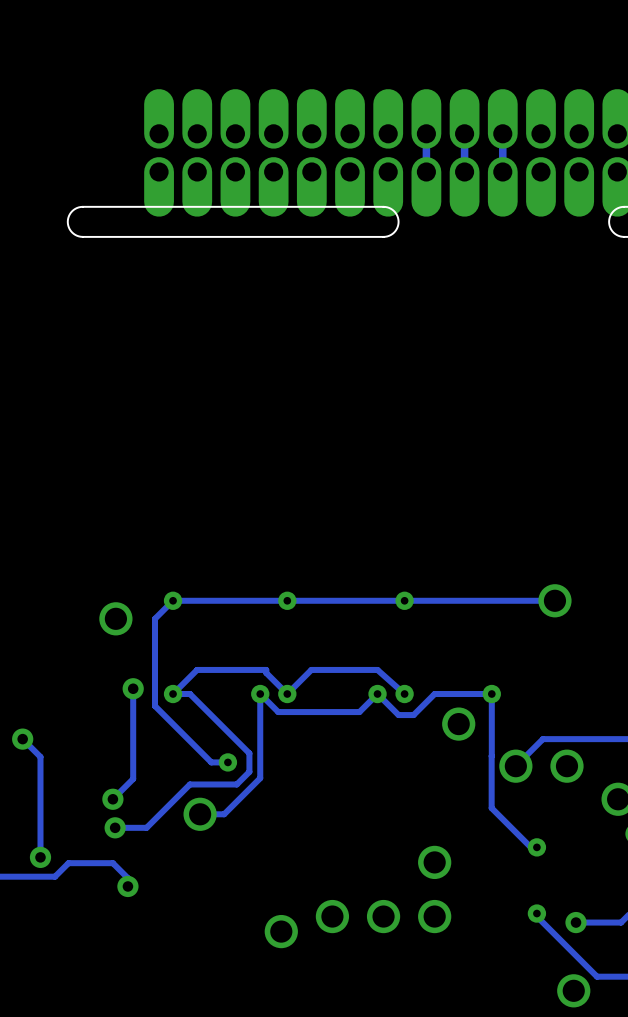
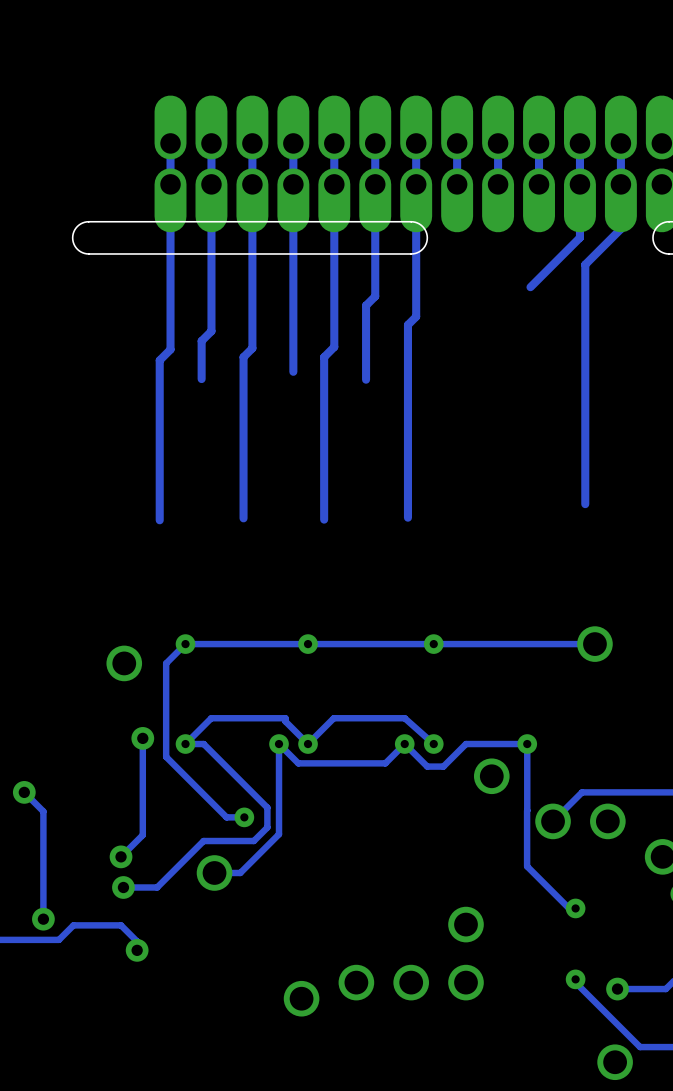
track: none -> (170, 143) (170, 349) (159, 360) (159, 520)
track: none -> (211, 143) (211, 331) (201, 341) (201, 379)
track: none -> (252, 143) (252, 348) (243, 357) (243, 518)
track: none -> (293, 143) (293, 371)
track: none -> (334, 143) (334, 347) (324, 357) (324, 519)
track: none -> (375, 143) (375, 296) (366, 305) (366, 379)
track: none -> (416, 143) (416, 316) (407, 324) (407, 517)
track: none -> (579, 143) (579, 237) (530, 287)
track: none -> (620, 143) (620, 229) (585, 264) (585, 504)

